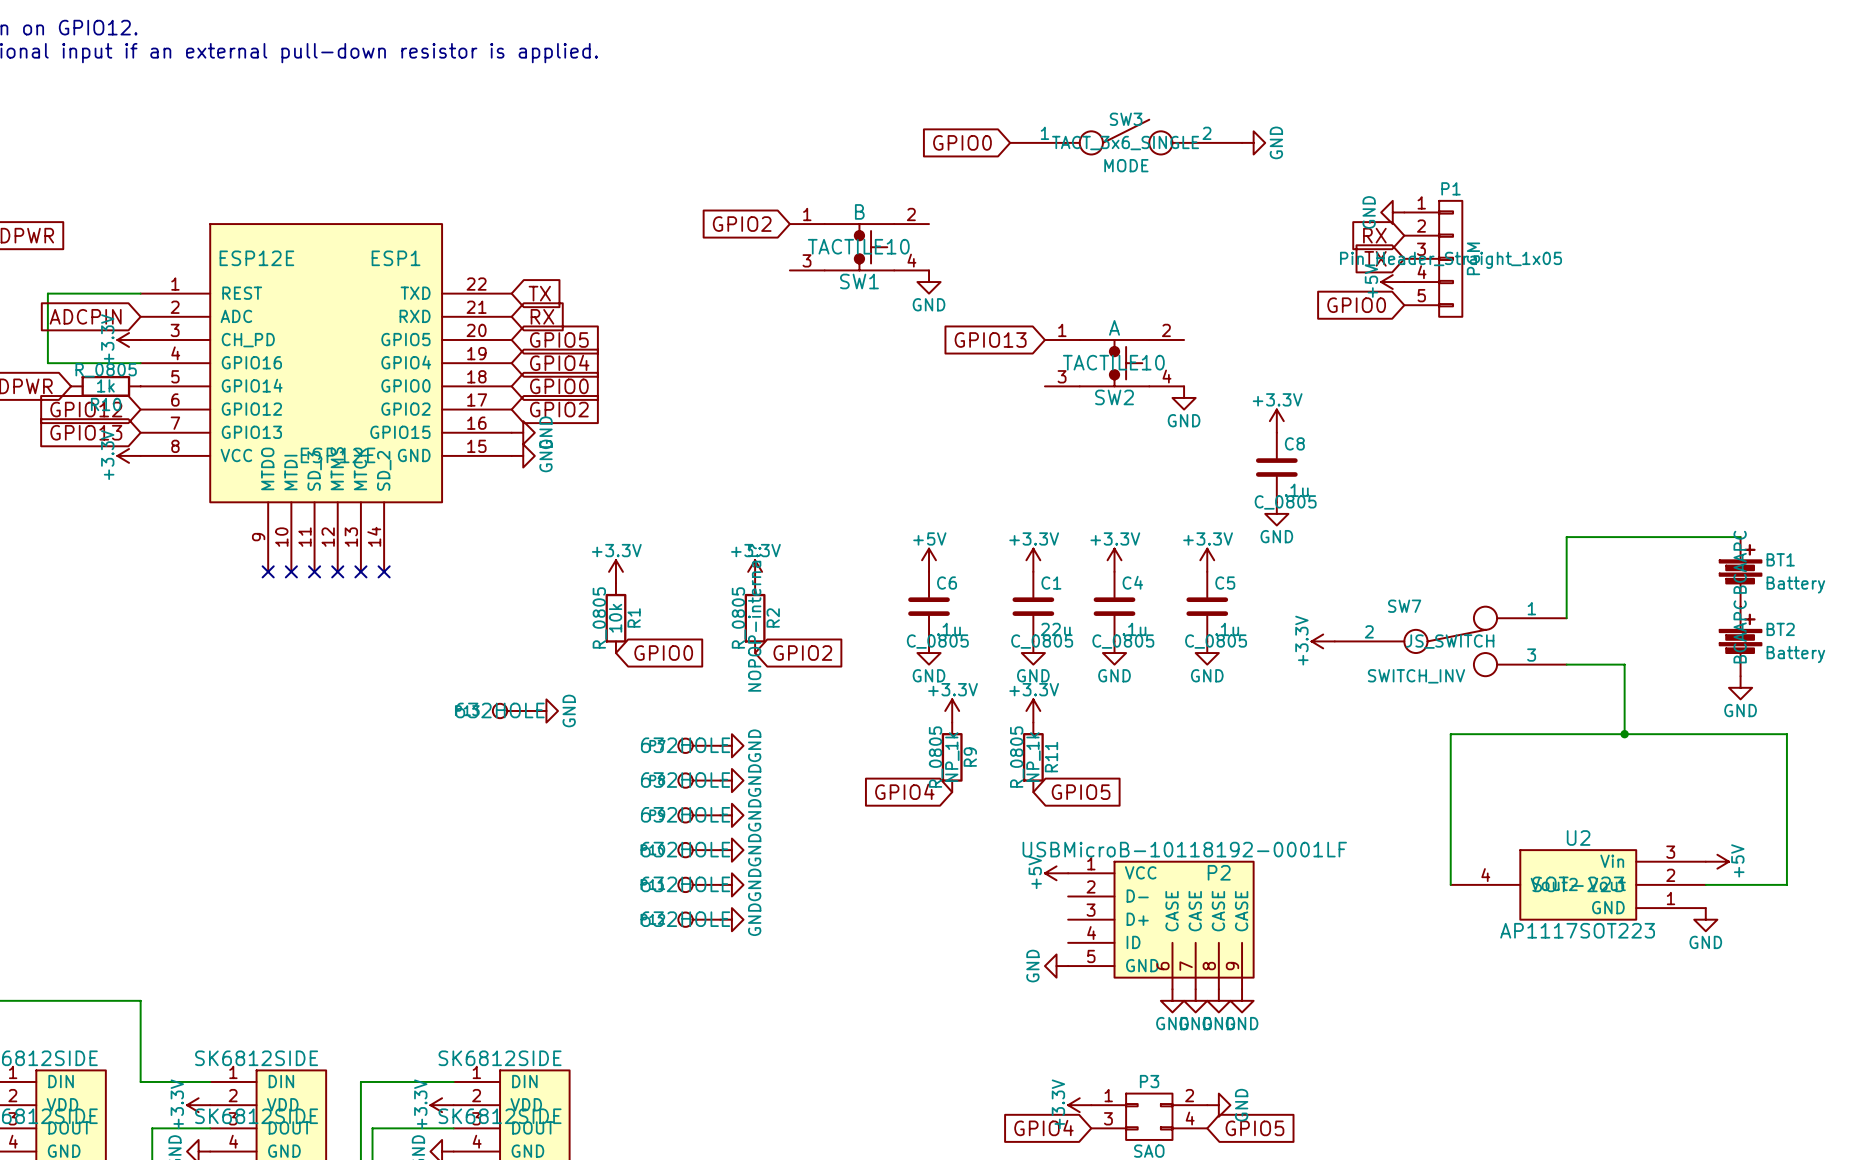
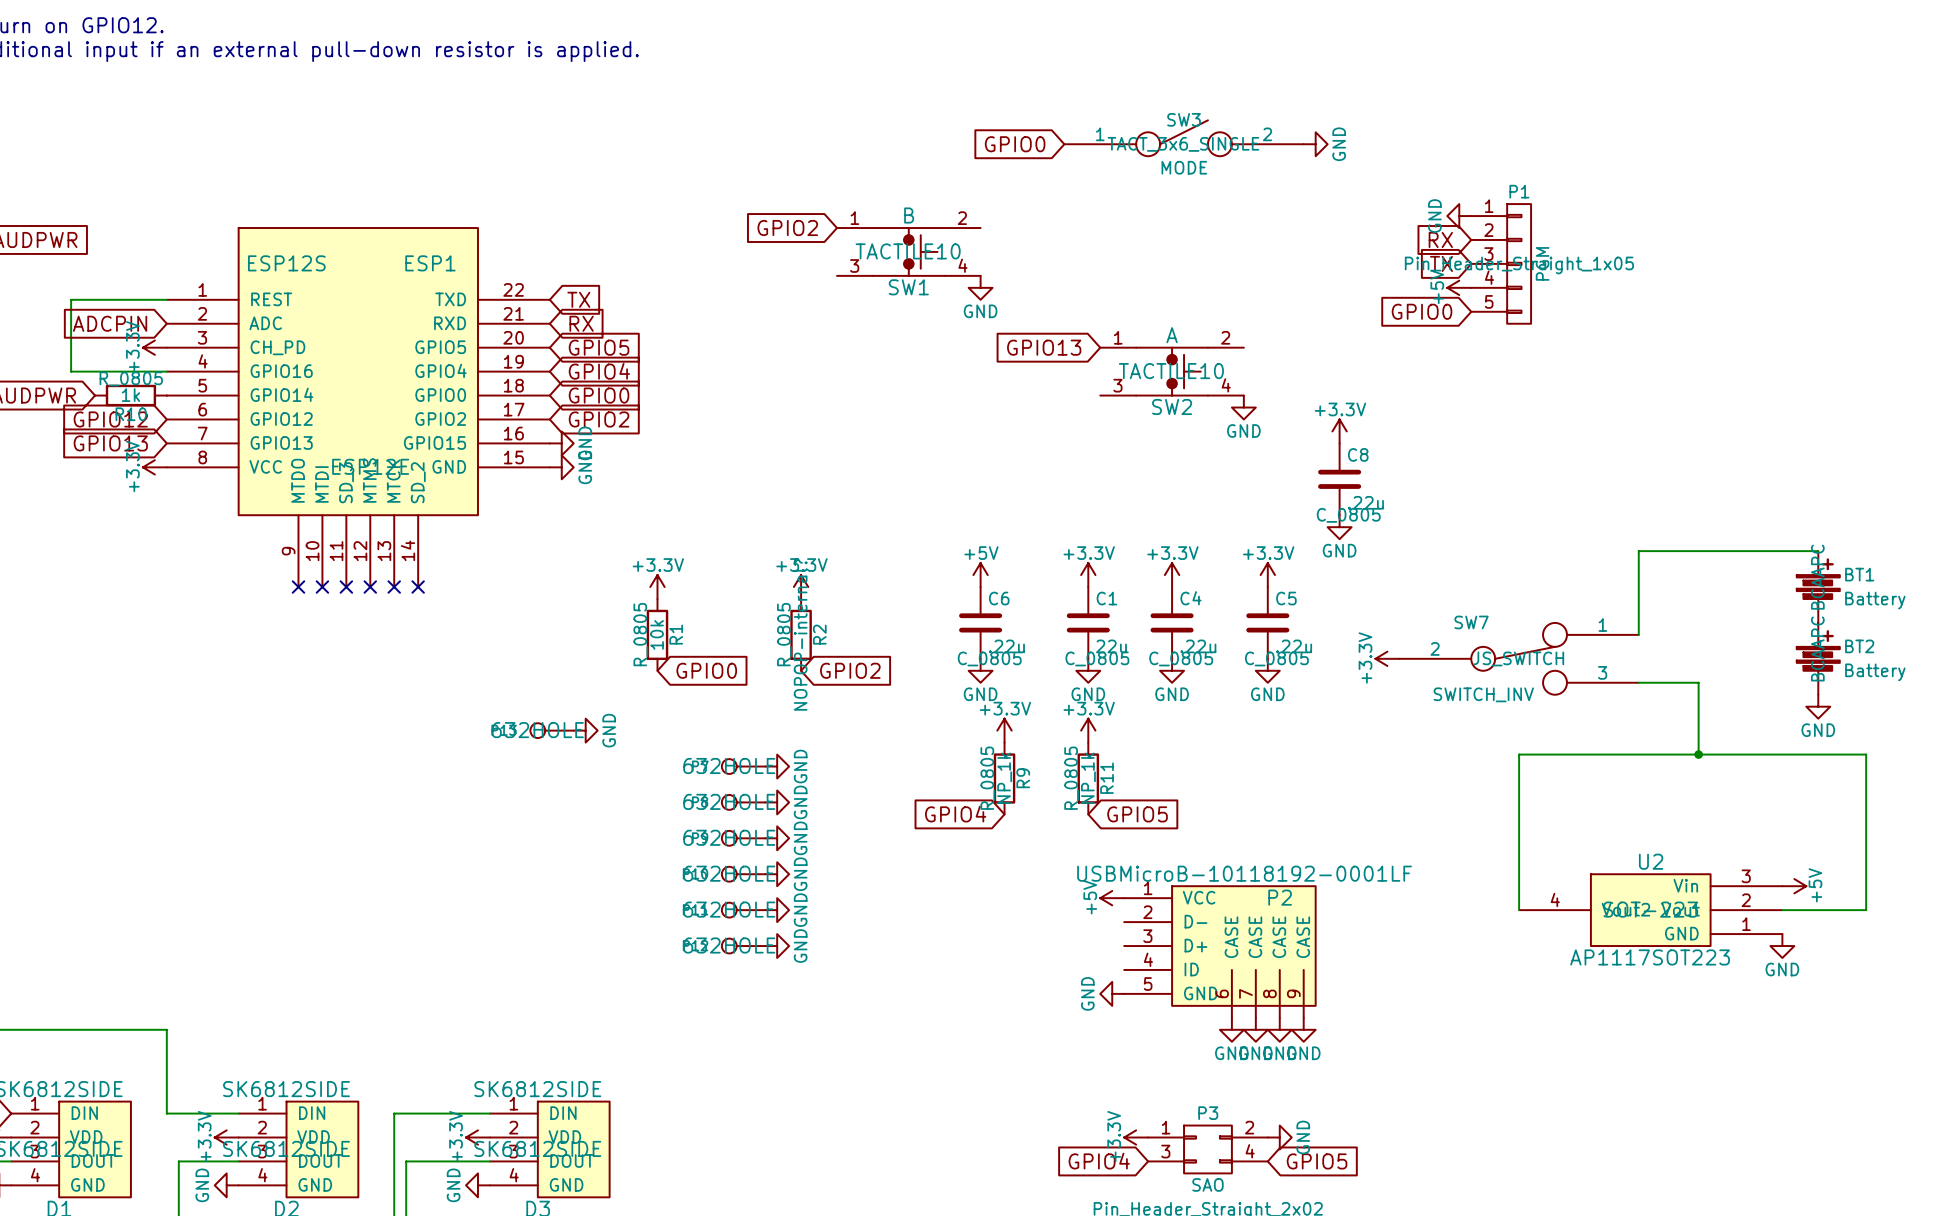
ESP1 value: ESP12E (256, 258) -> ESP12S (286, 263)
C8 value: .1u (1296, 490) -> .22u (1365, 502)
C6 value: .1u (948, 629) -> .22u (1006, 646)
C4 value: .1u (1134, 629) -> .22u (1198, 646)
C5 value: .1u (1227, 629) -> .22u (1294, 646)

